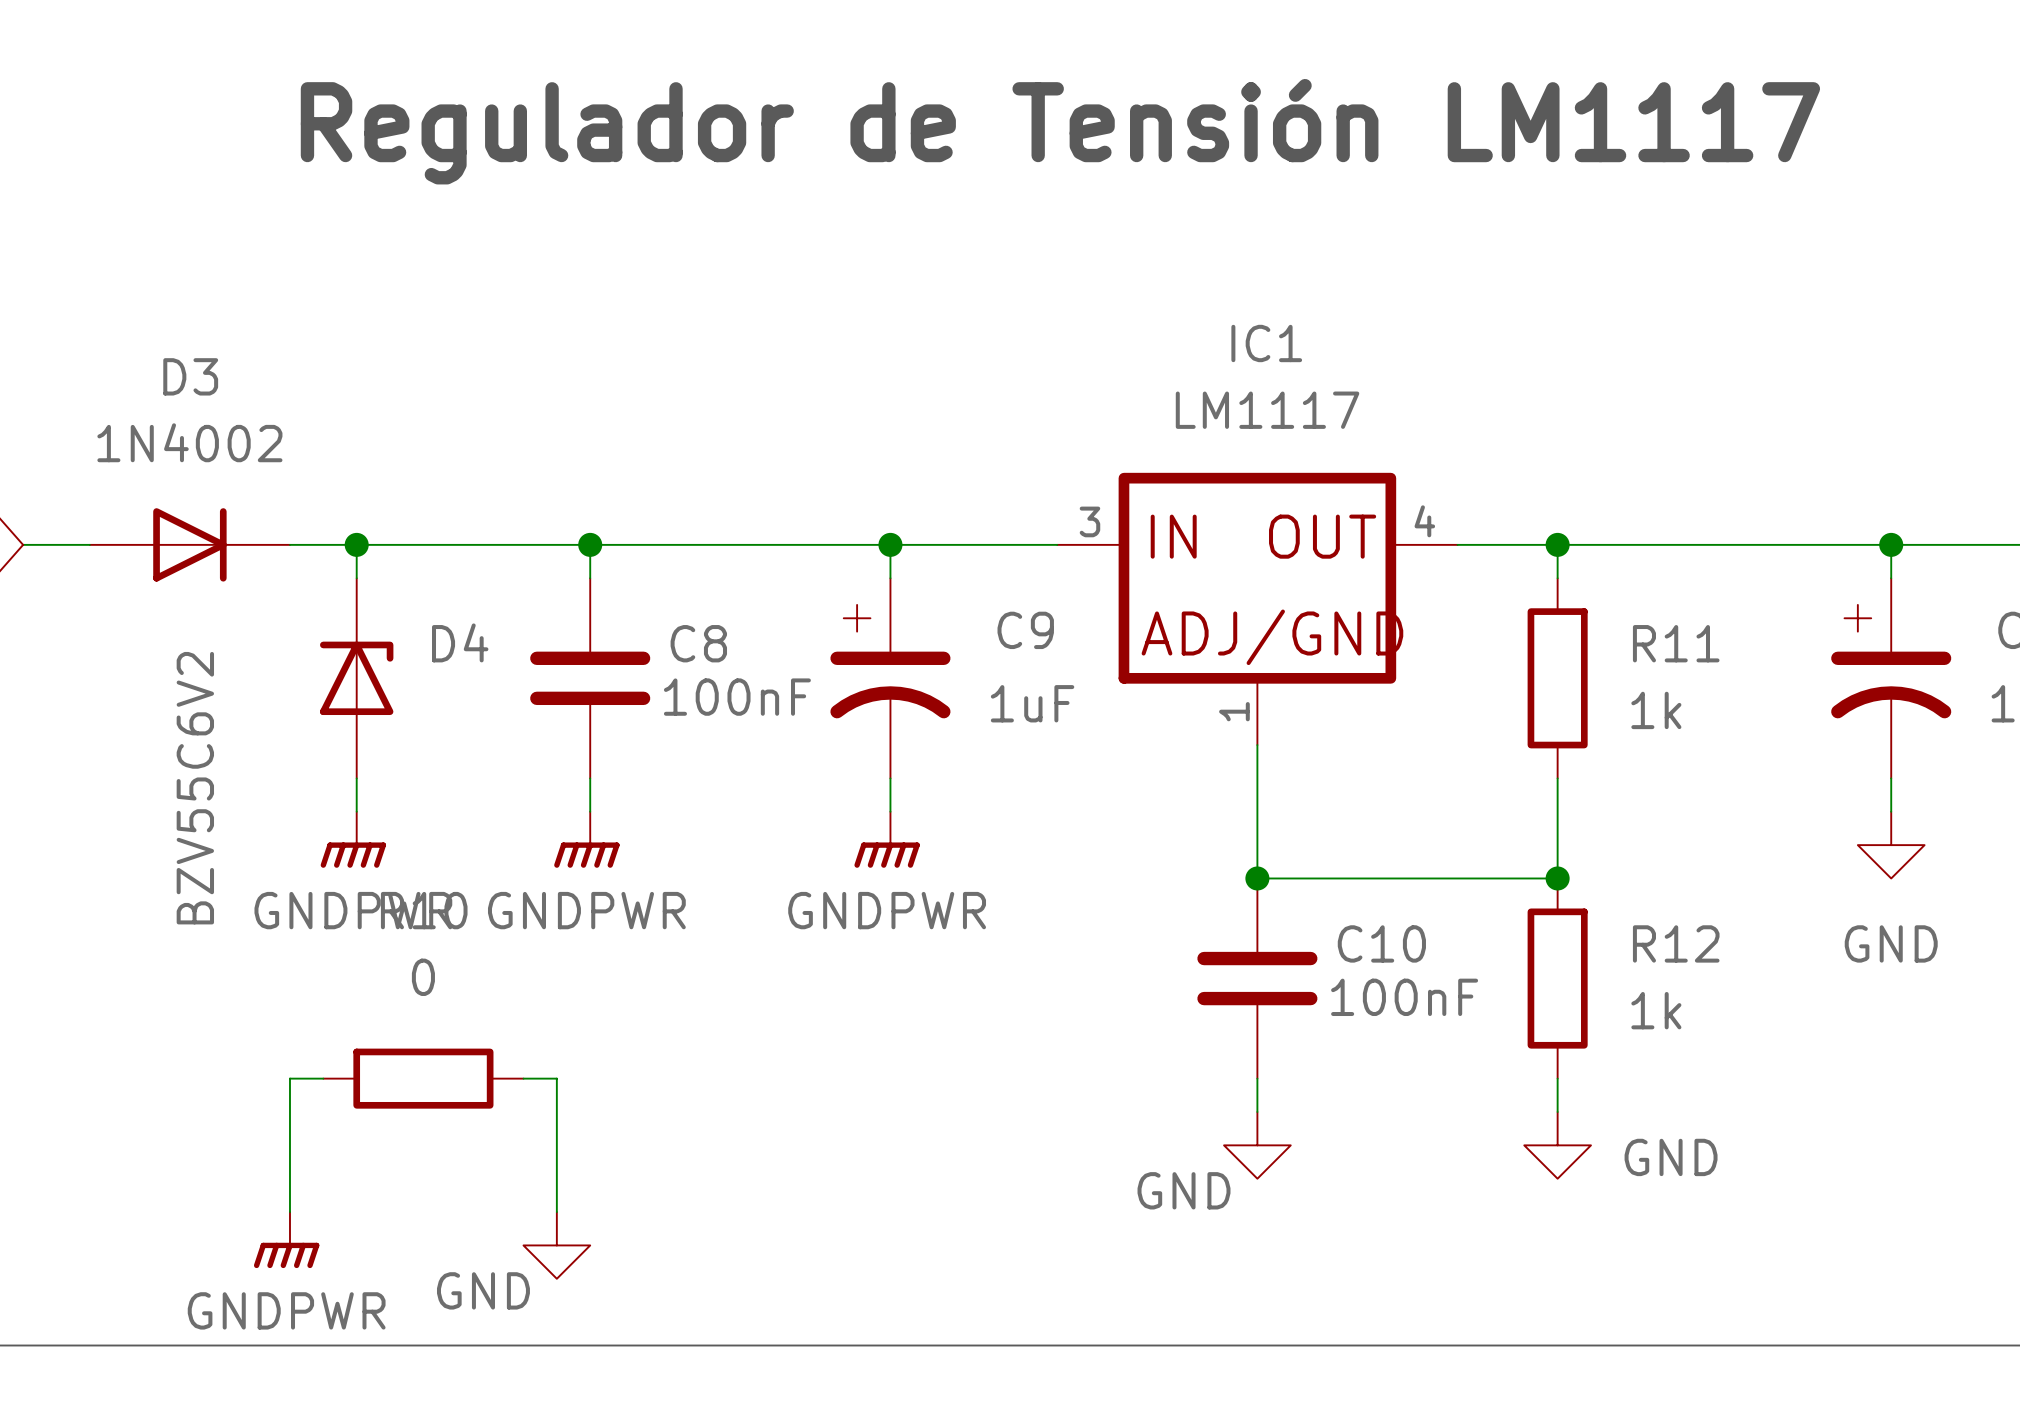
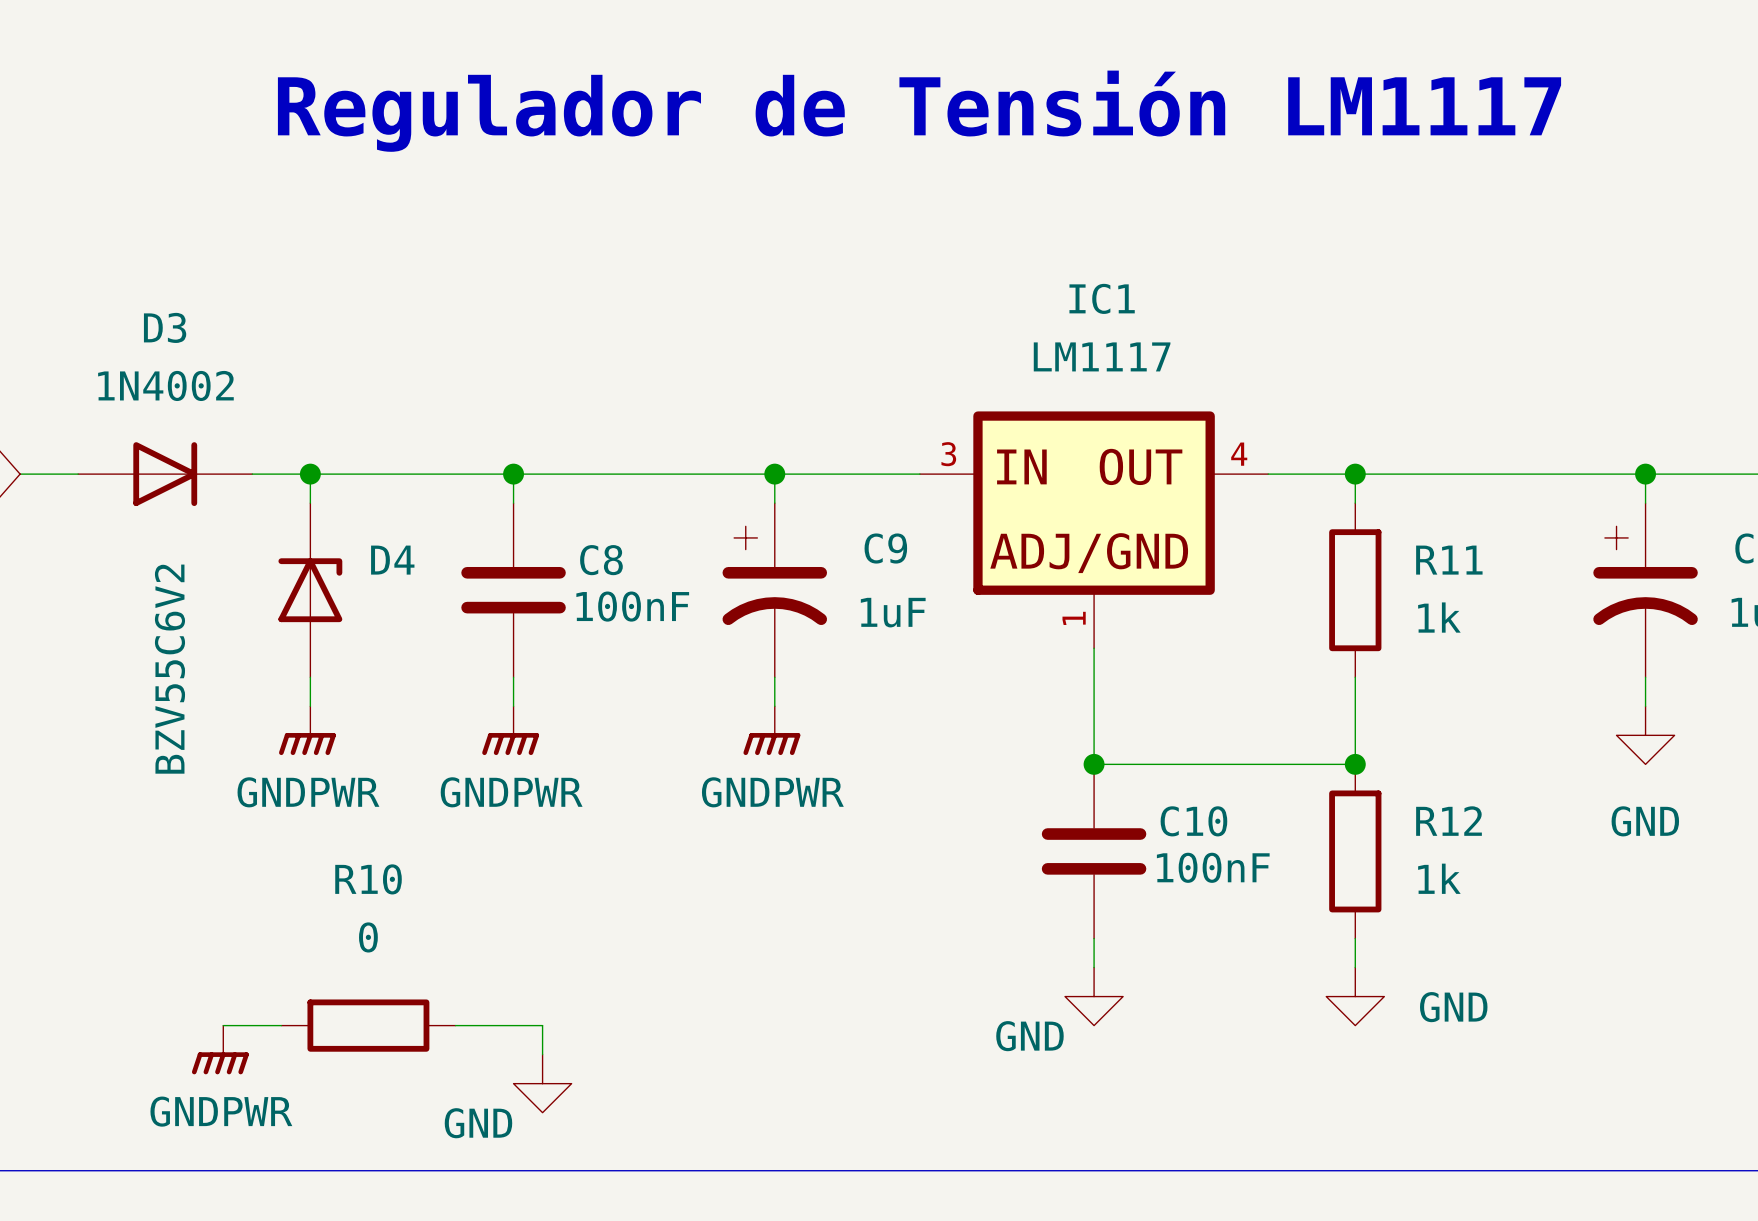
wire: (323, 1078) (289, 1078) (289, 1212) -> none
R10 position: (423, 1078) -> (368, 1025)
wire: (523, 1078) (556, 1078) (556, 1212) -> none
wire: none -> (223, 1025) (281, 1025)
wire: none -> (455, 1025) (542, 1025) (542, 1054)
power symbol position: GNDPWR (286, 1240) -> GNDPWR (220, 1049)
power symbol position: GND (556, 1245) -> GND (542, 1083)

